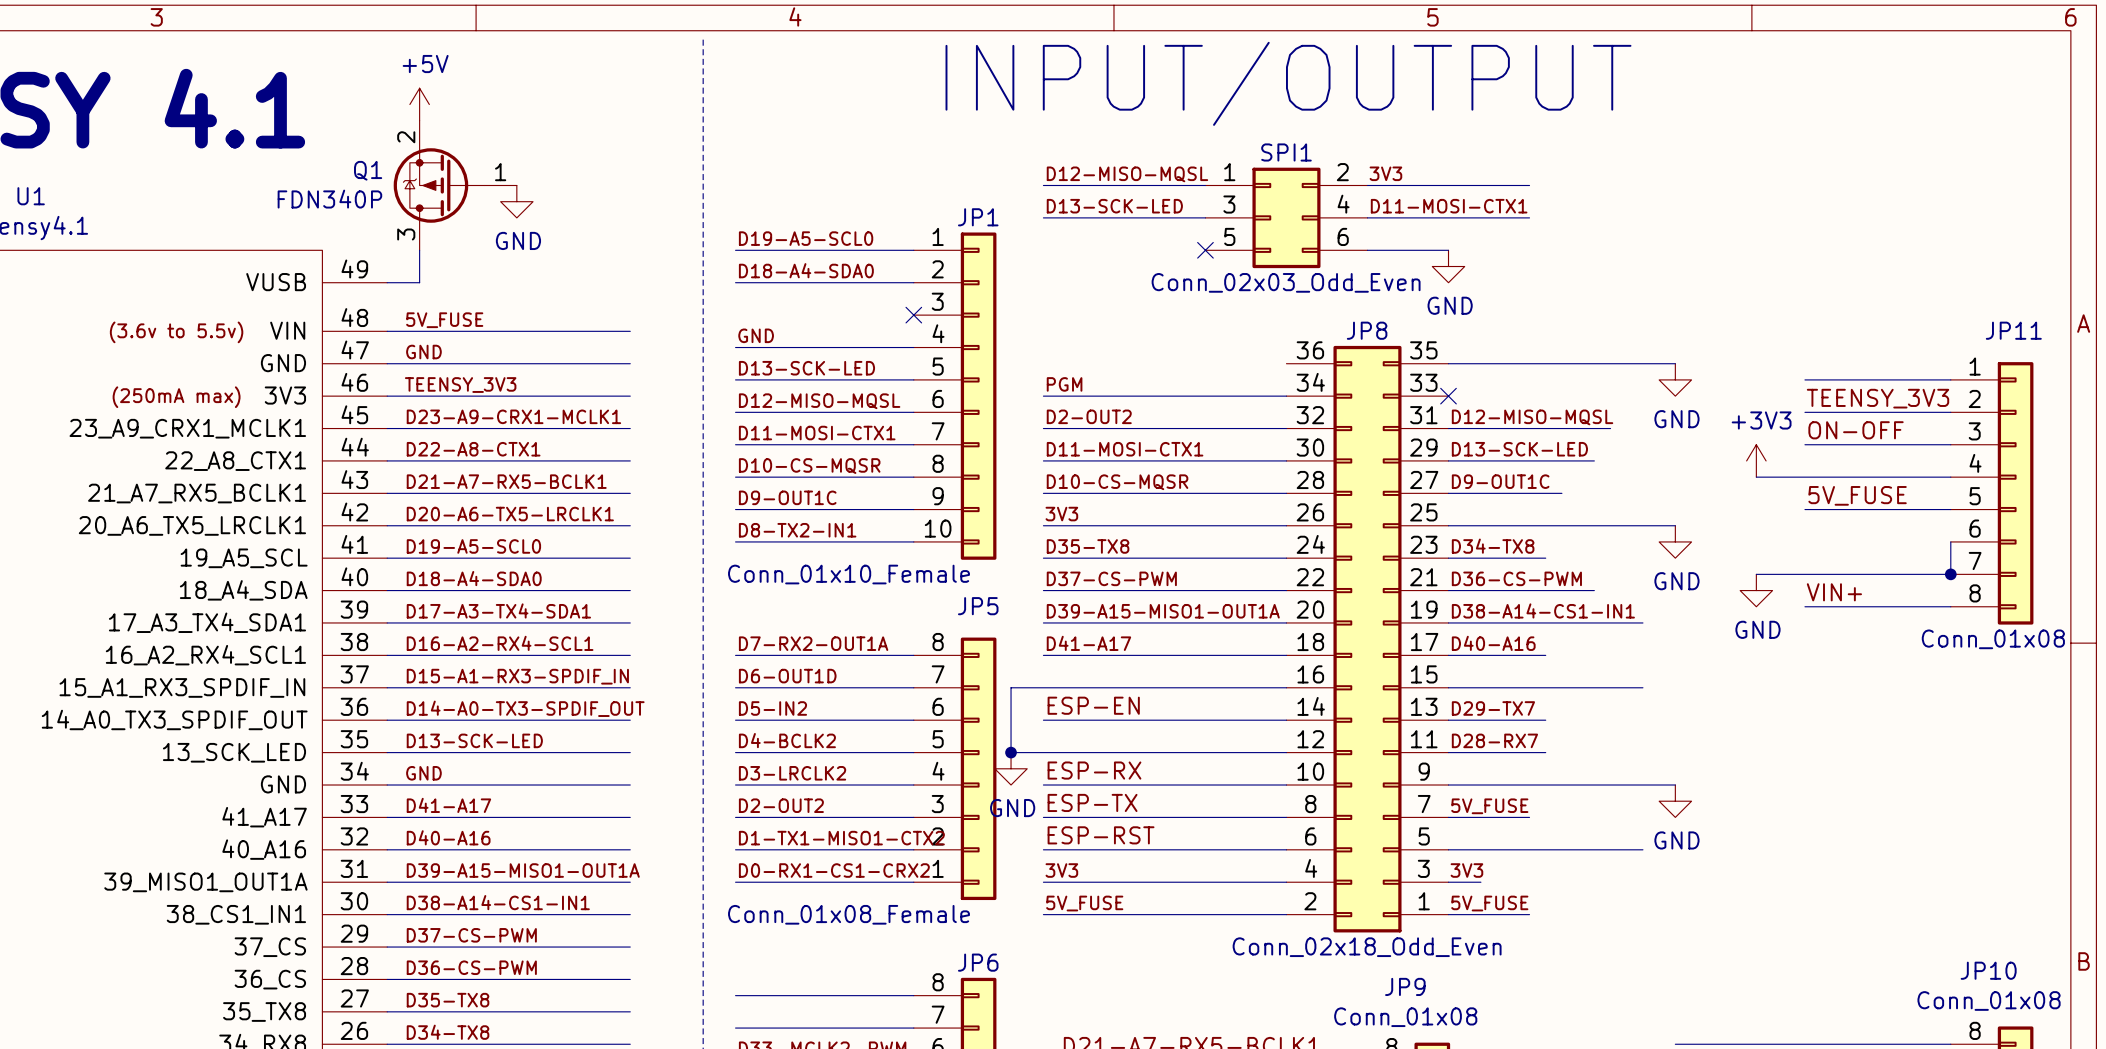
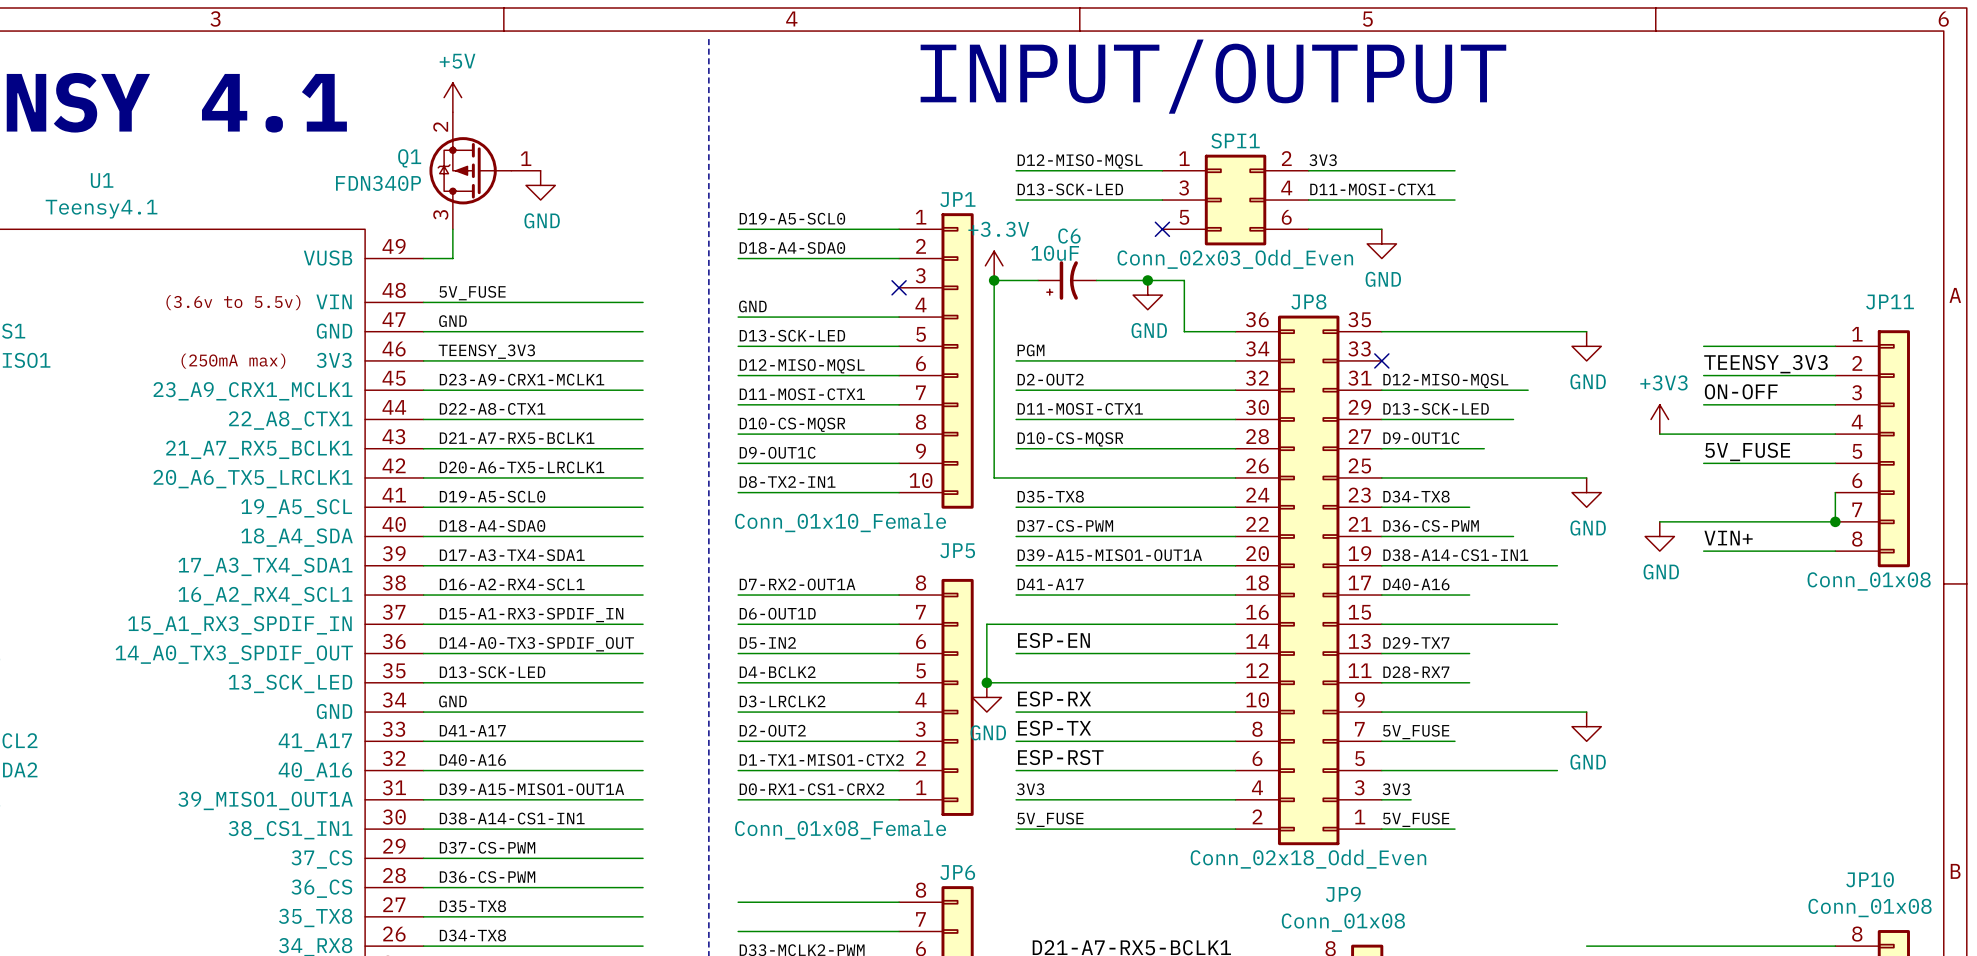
power symbol: none -> +3.3V (994, 265)
junction: none -> (994, 280)
wire: none -> (1038, 280) (994, 280) (994, 477) (1016, 477)
C6: none -> 10uF (1067, 280)
wire: none -> (1096, 280) (1184, 280) (1184, 331) (1235, 331)
junction: none -> (1147, 280)
power symbol: none -> GND (1147, 295)
label: 3V3 (1061, 514) -> none

